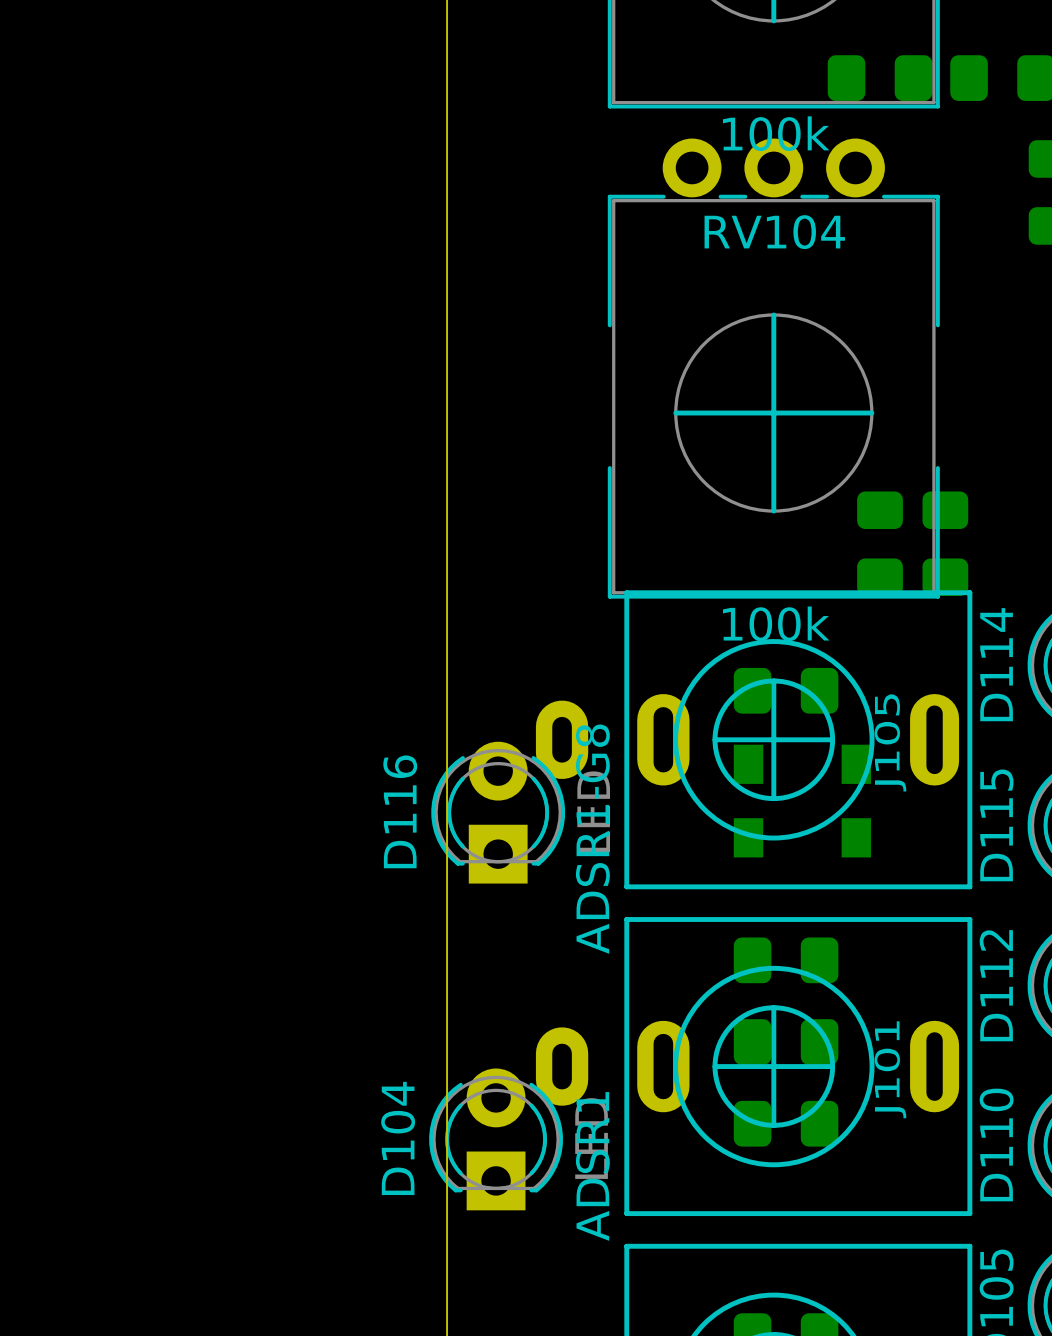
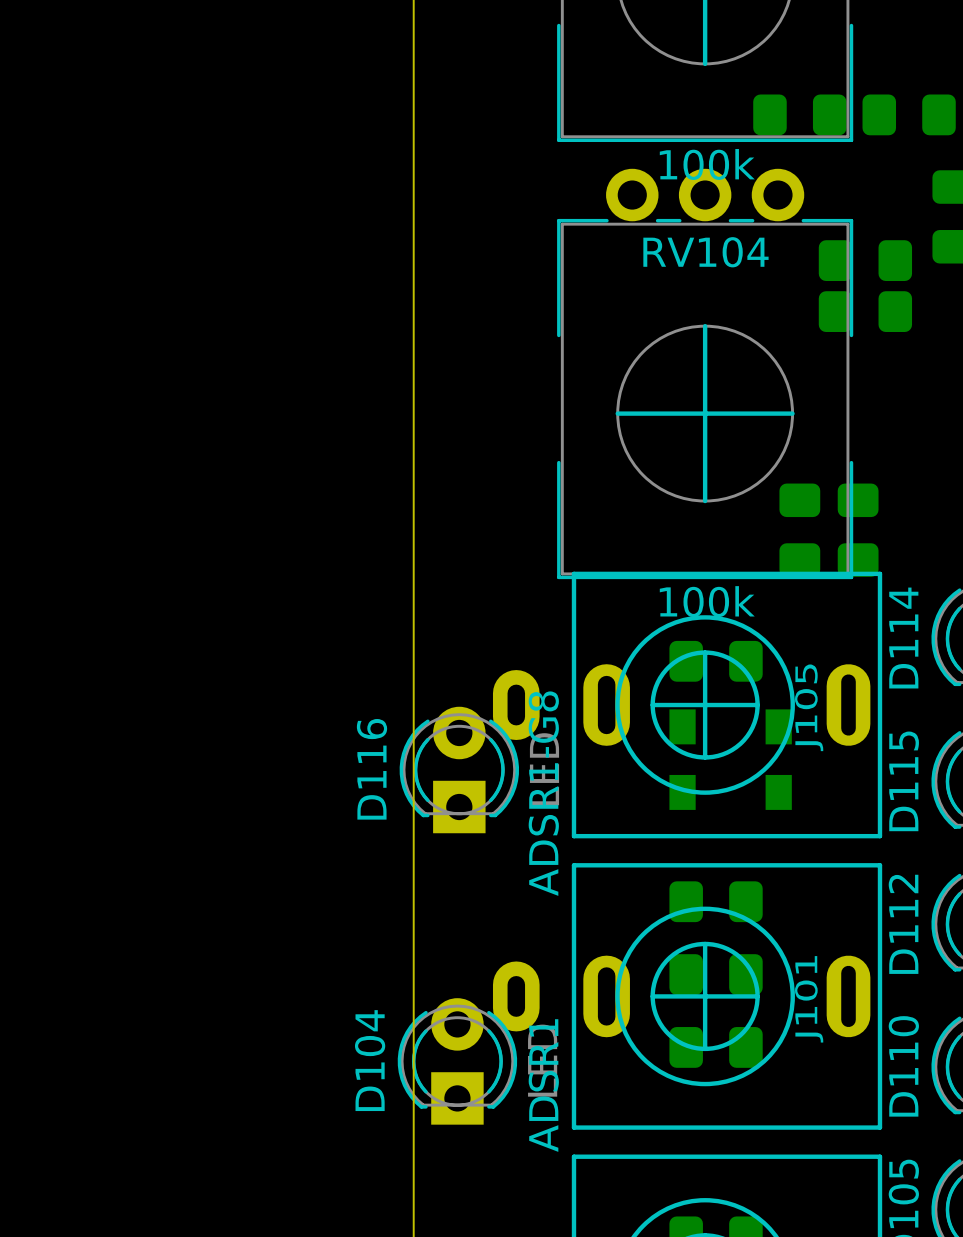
part: none -> (865, 260)
part: none -> (865, 311)

